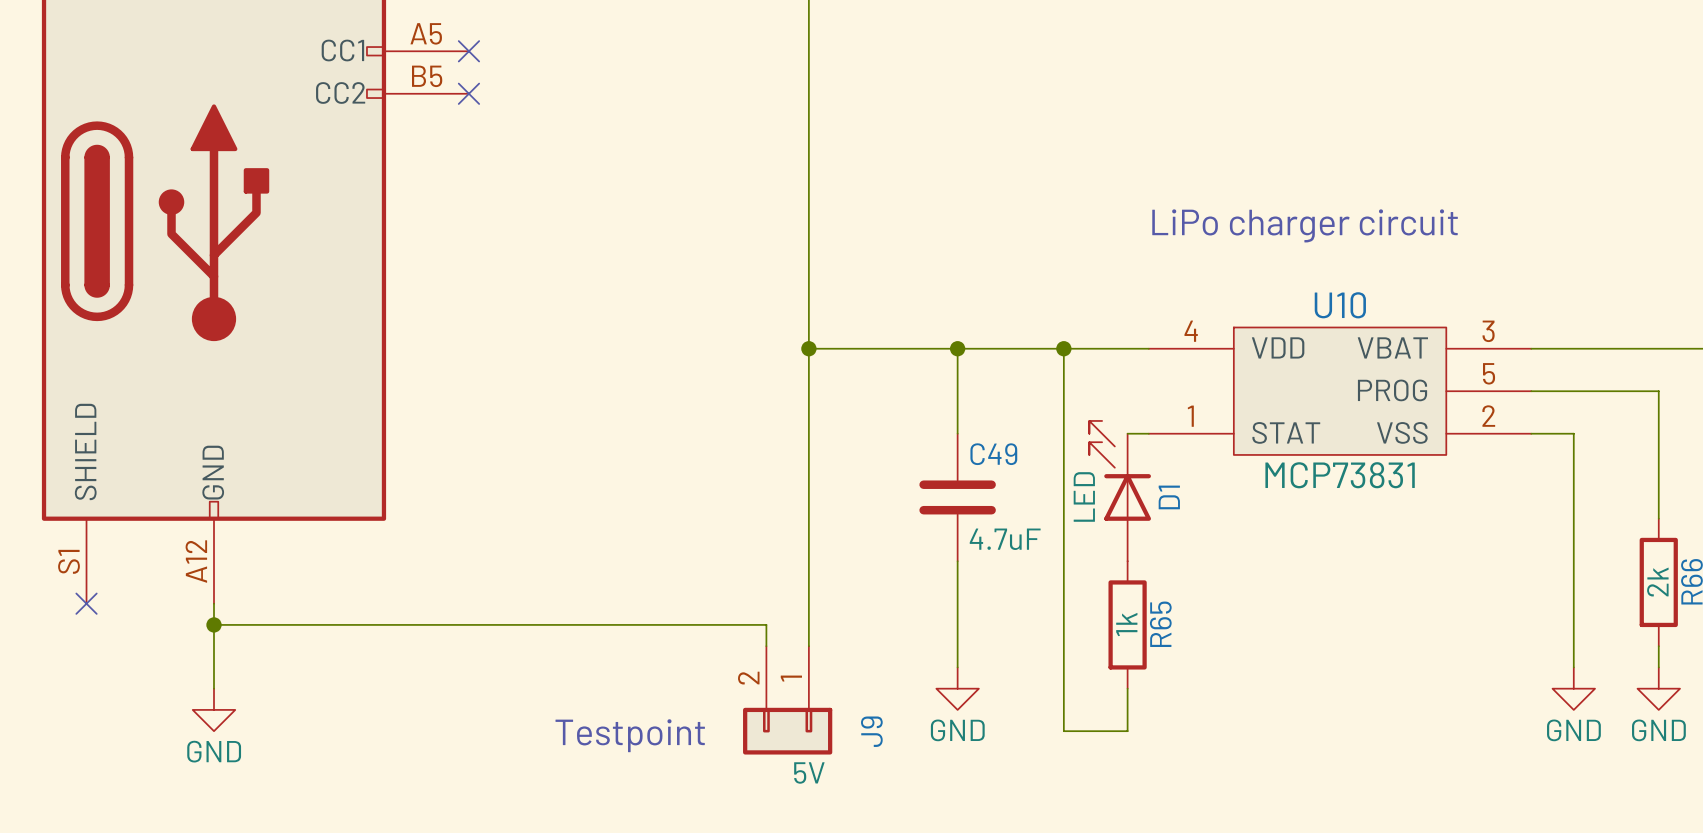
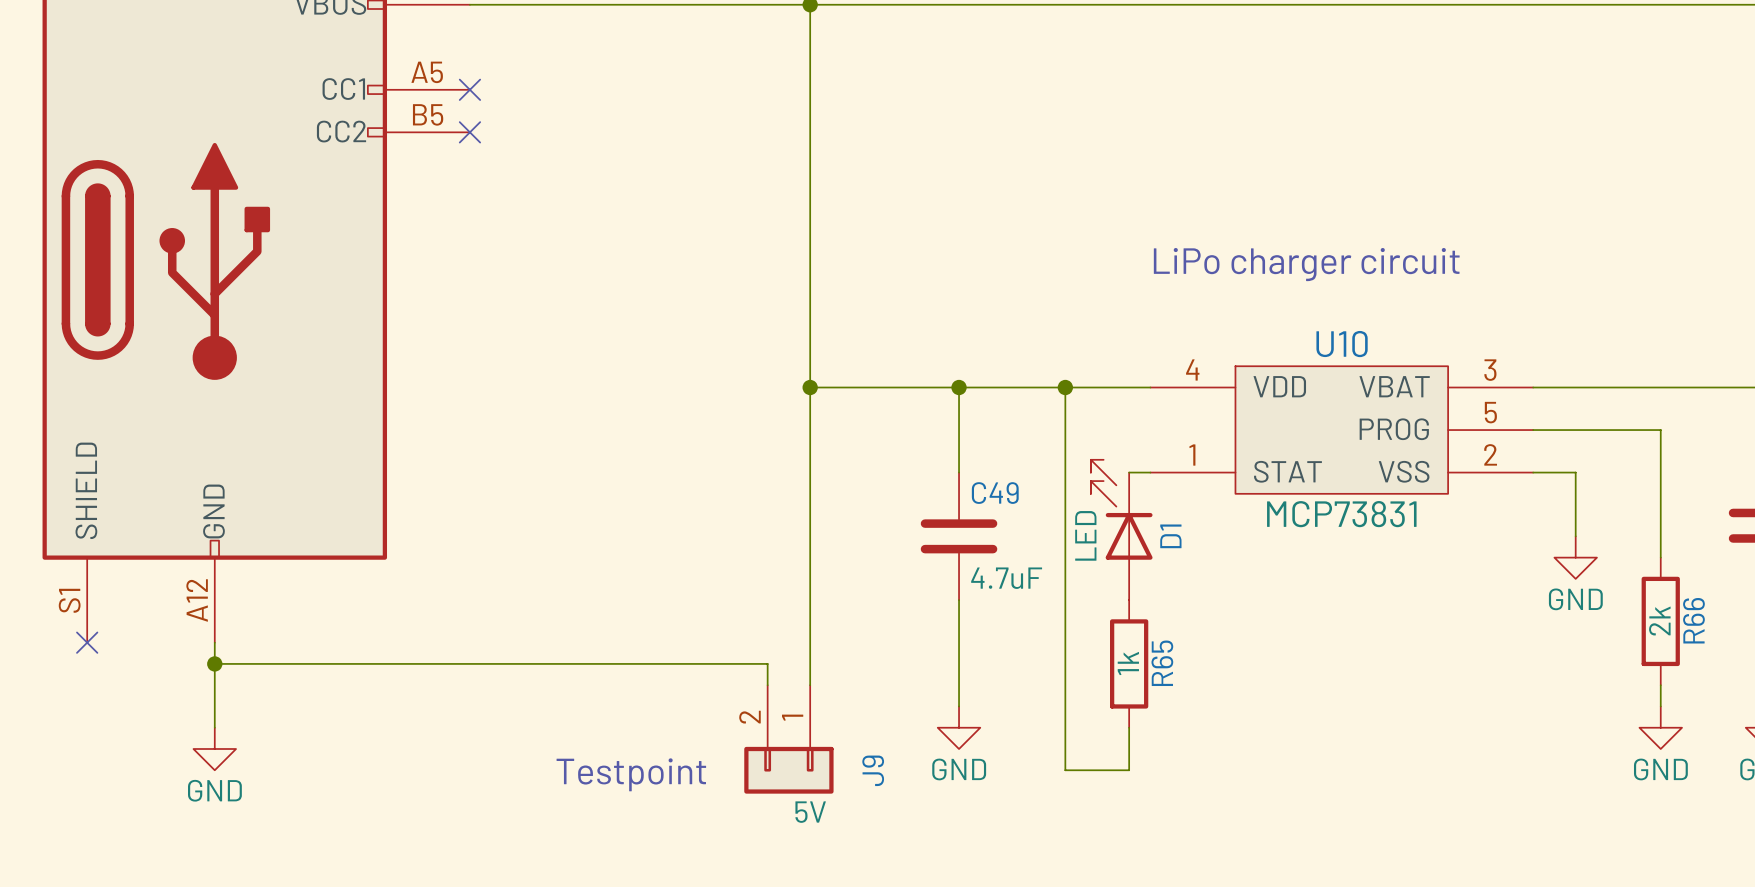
wire: (1573, 497) (1573, 667) -> none
power symbol: none -> GND (1575, 557)
power symbol: GND (1573, 688) -> none

